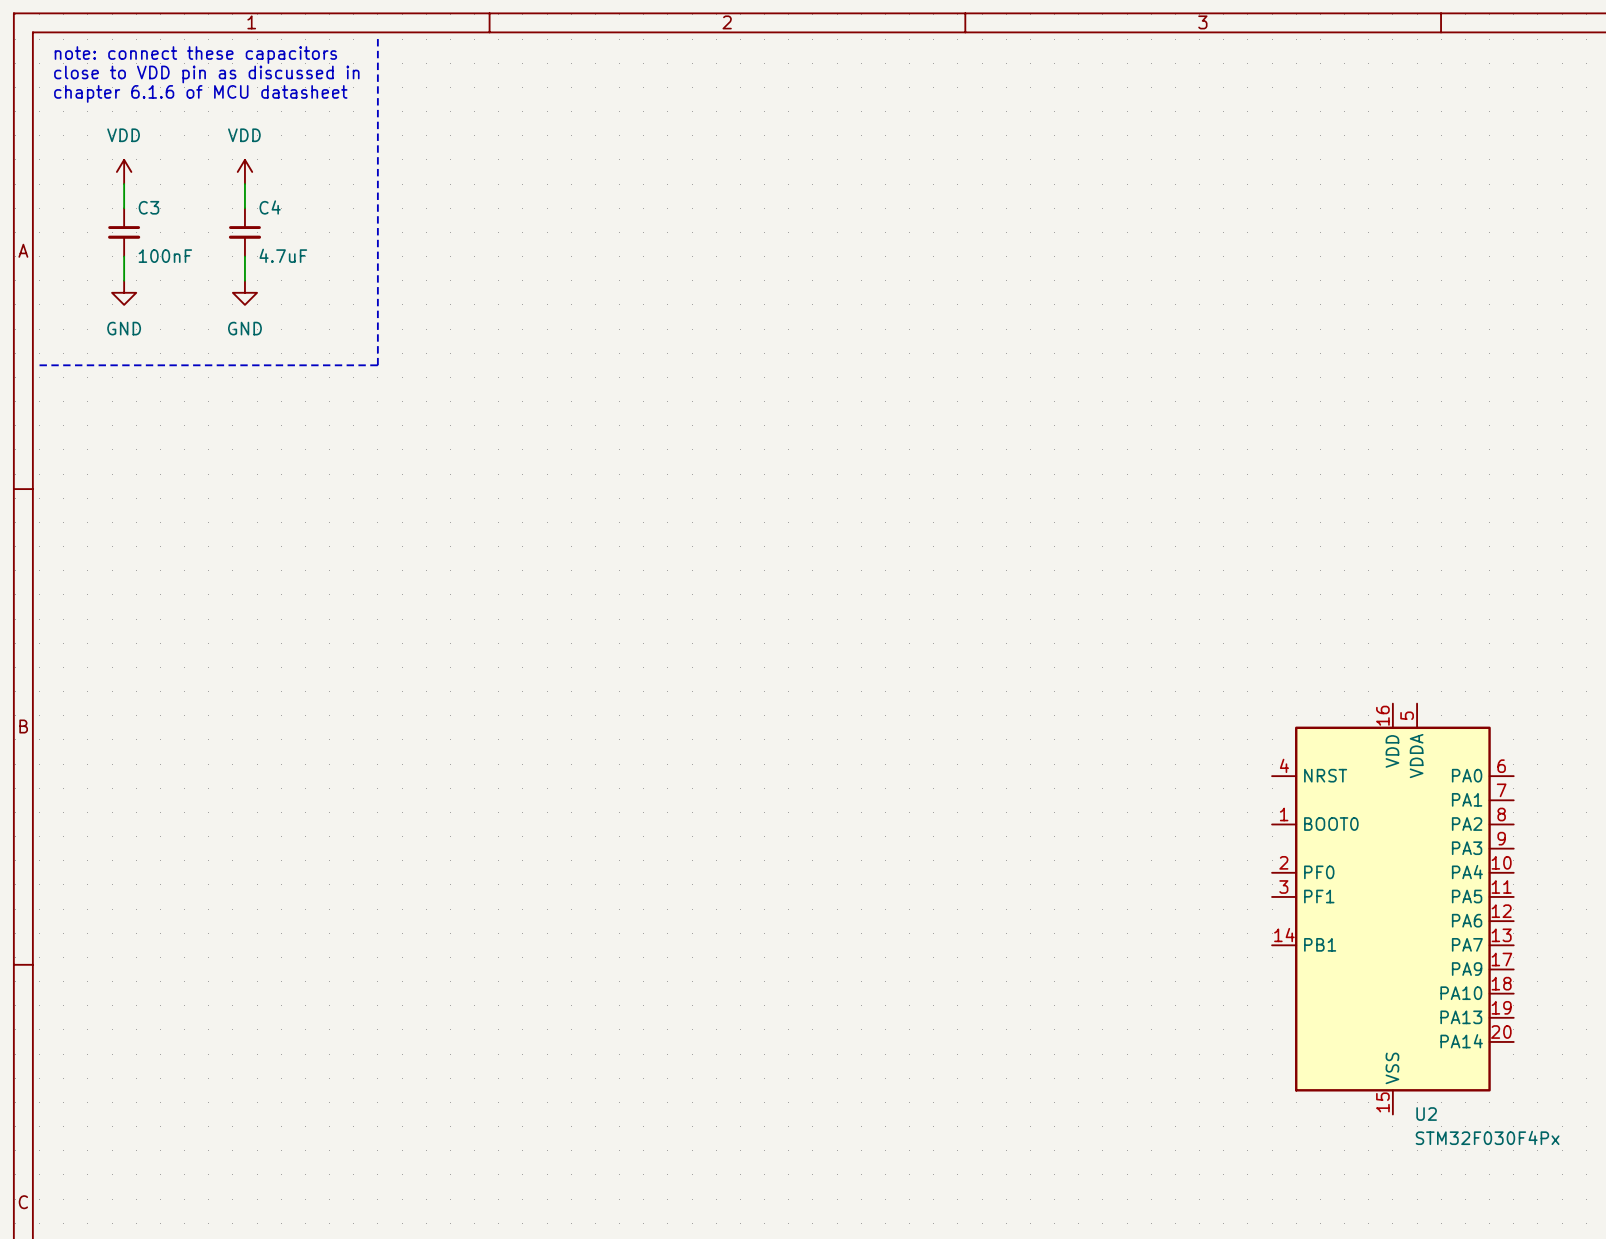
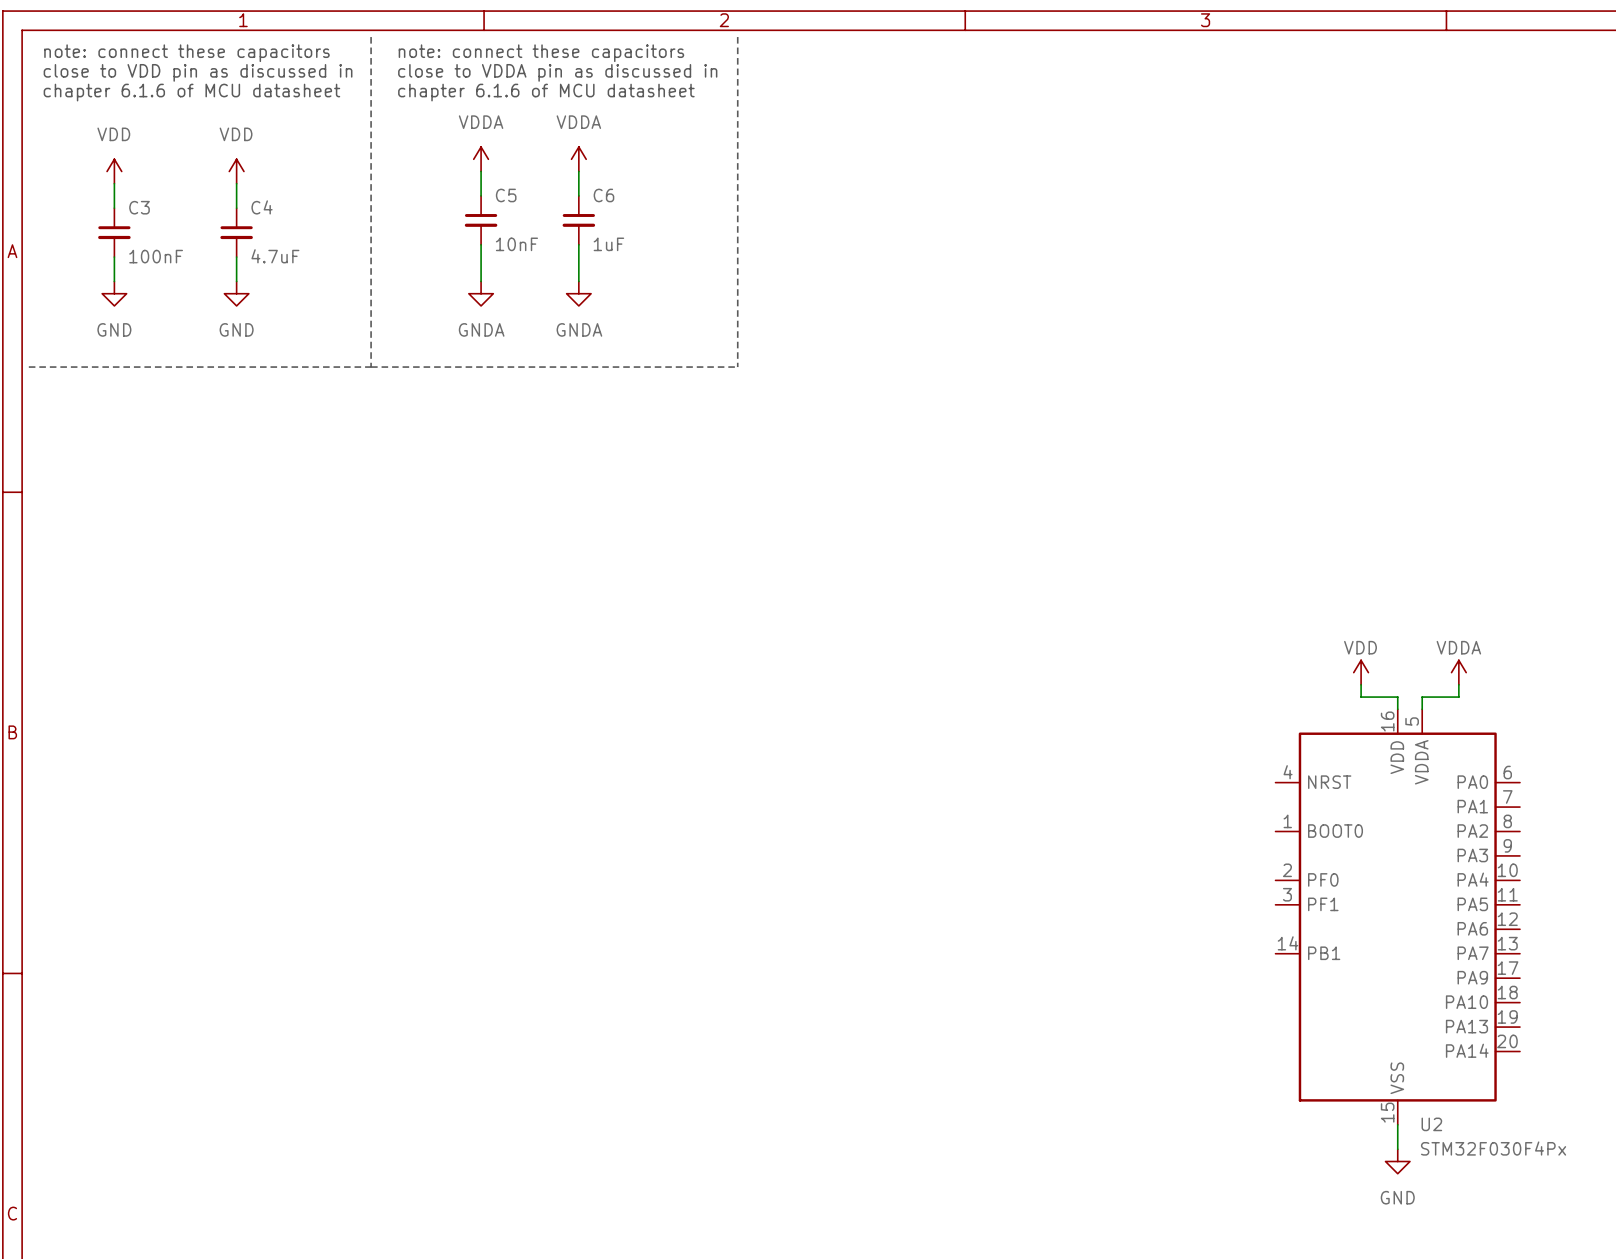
line: none -> (737, 37) (737, 367) (371, 367)
text: none -> note: connect these capacitors (541, 53)
text: none -> close to VDDA pin as discussed in (557, 72)
text: none -> chapter 6.1.6 of MCU datasheet (546, 92)
power symbol: none -> VDDA (481, 159)
power symbol: none -> VDDA (578, 159)
wire: none -> (481, 171) (481, 195)
wire: none -> (578, 171) (578, 195)
C5: none -> 10nF (481, 220)
C6: none -> 1uF (578, 220)
wire: none -> (481, 244) (481, 281)
wire: none -> (578, 244) (578, 281)
power symbol: none -> GNDA (481, 293)
power symbol: none -> GNDA (578, 293)
power symbol: none -> VDD (1361, 672)
power symbol: none -> VDDA (1458, 672)
wire: none -> (1361, 684) (1361, 697) (1397, 697) (1397, 709)
wire: none -> (1458, 684) (1458, 697) (1422, 697) (1422, 709)
wire: none -> (1397, 1124) (1397, 1149)
power symbol: none -> GND (1397, 1161)

